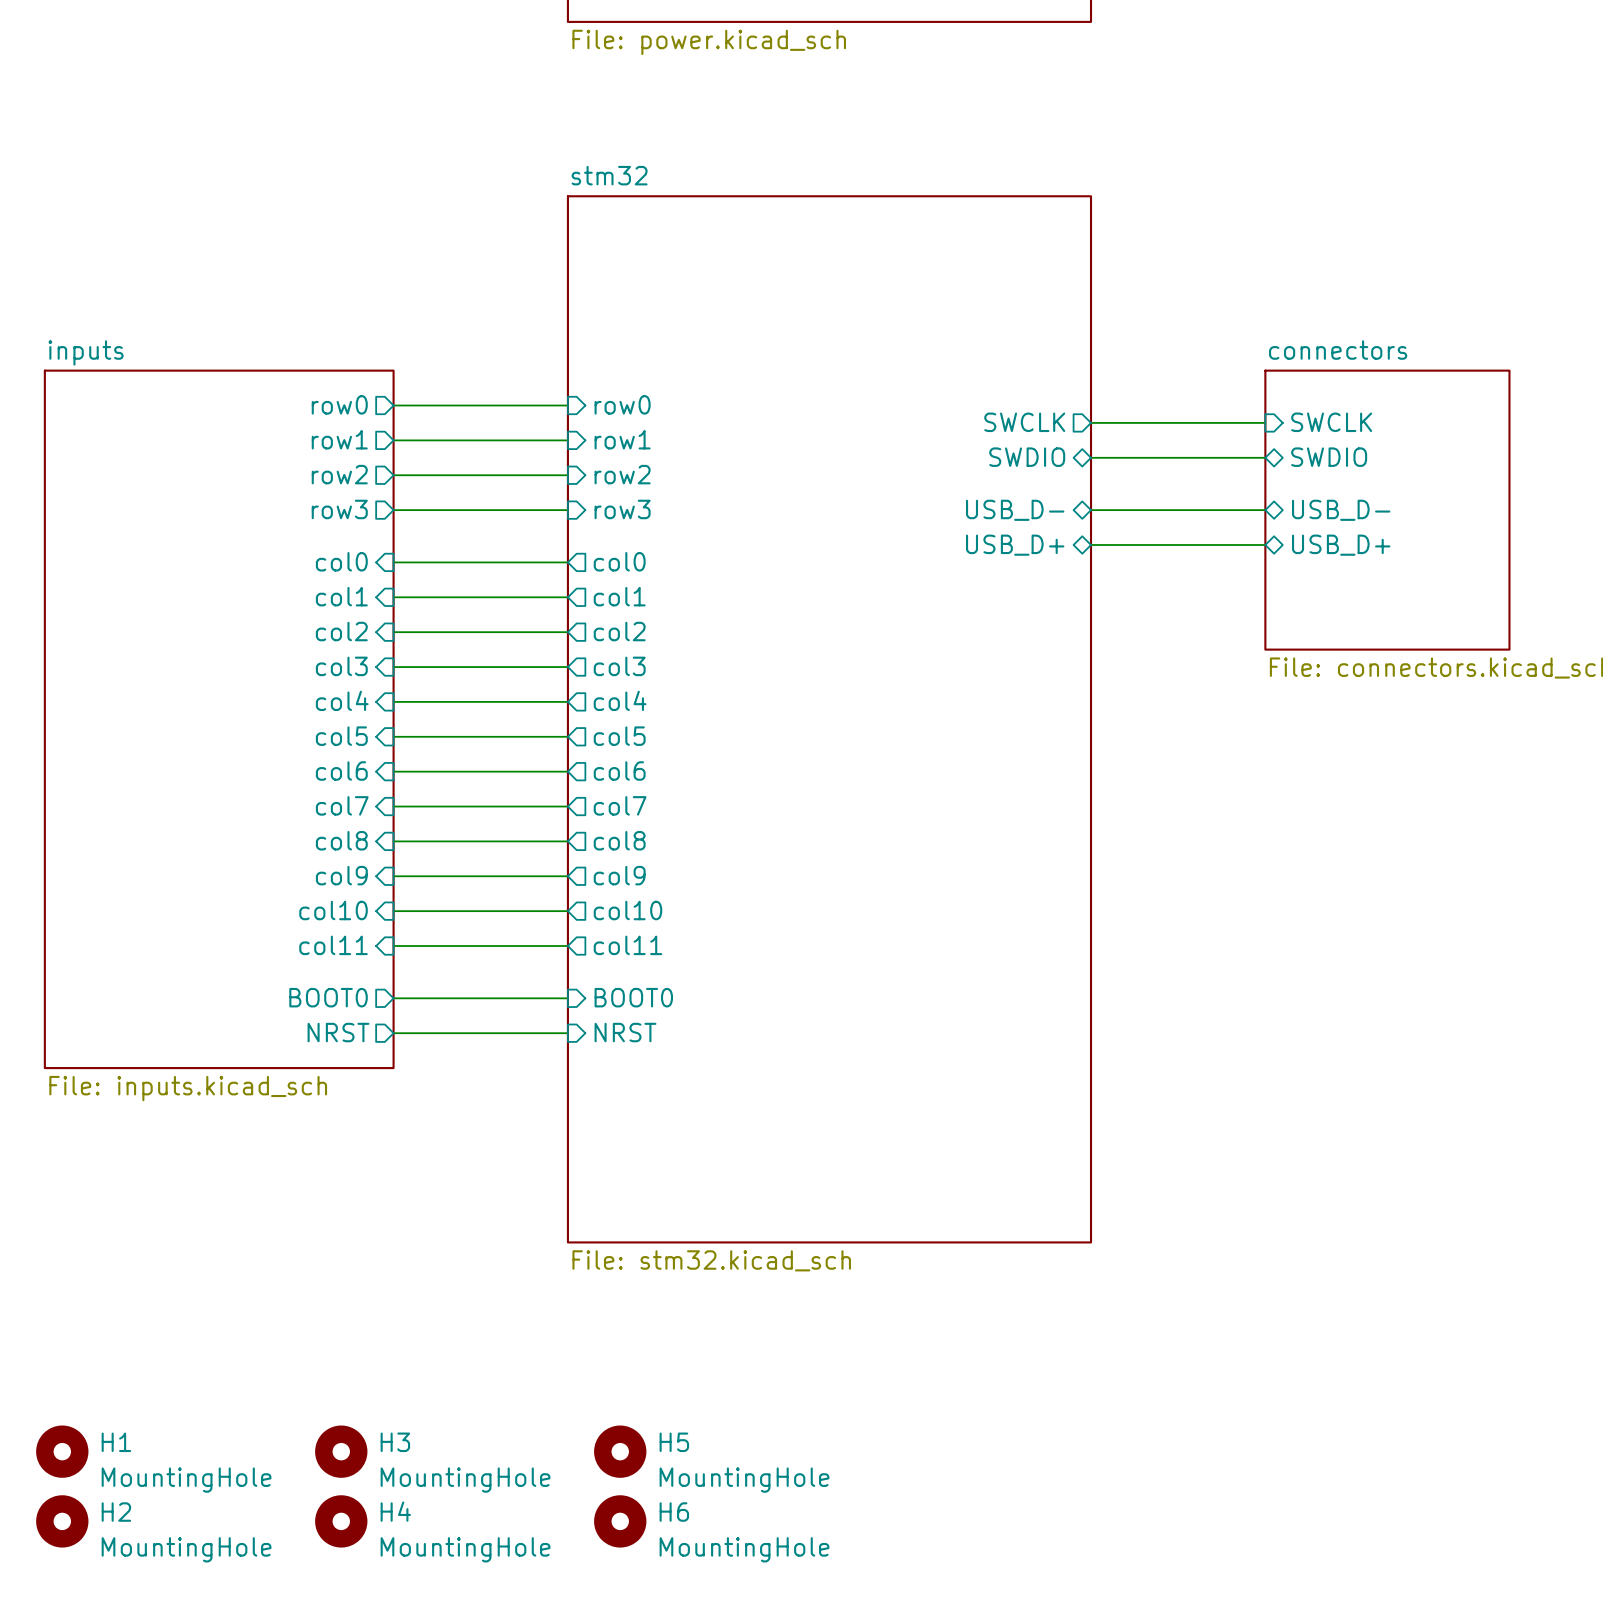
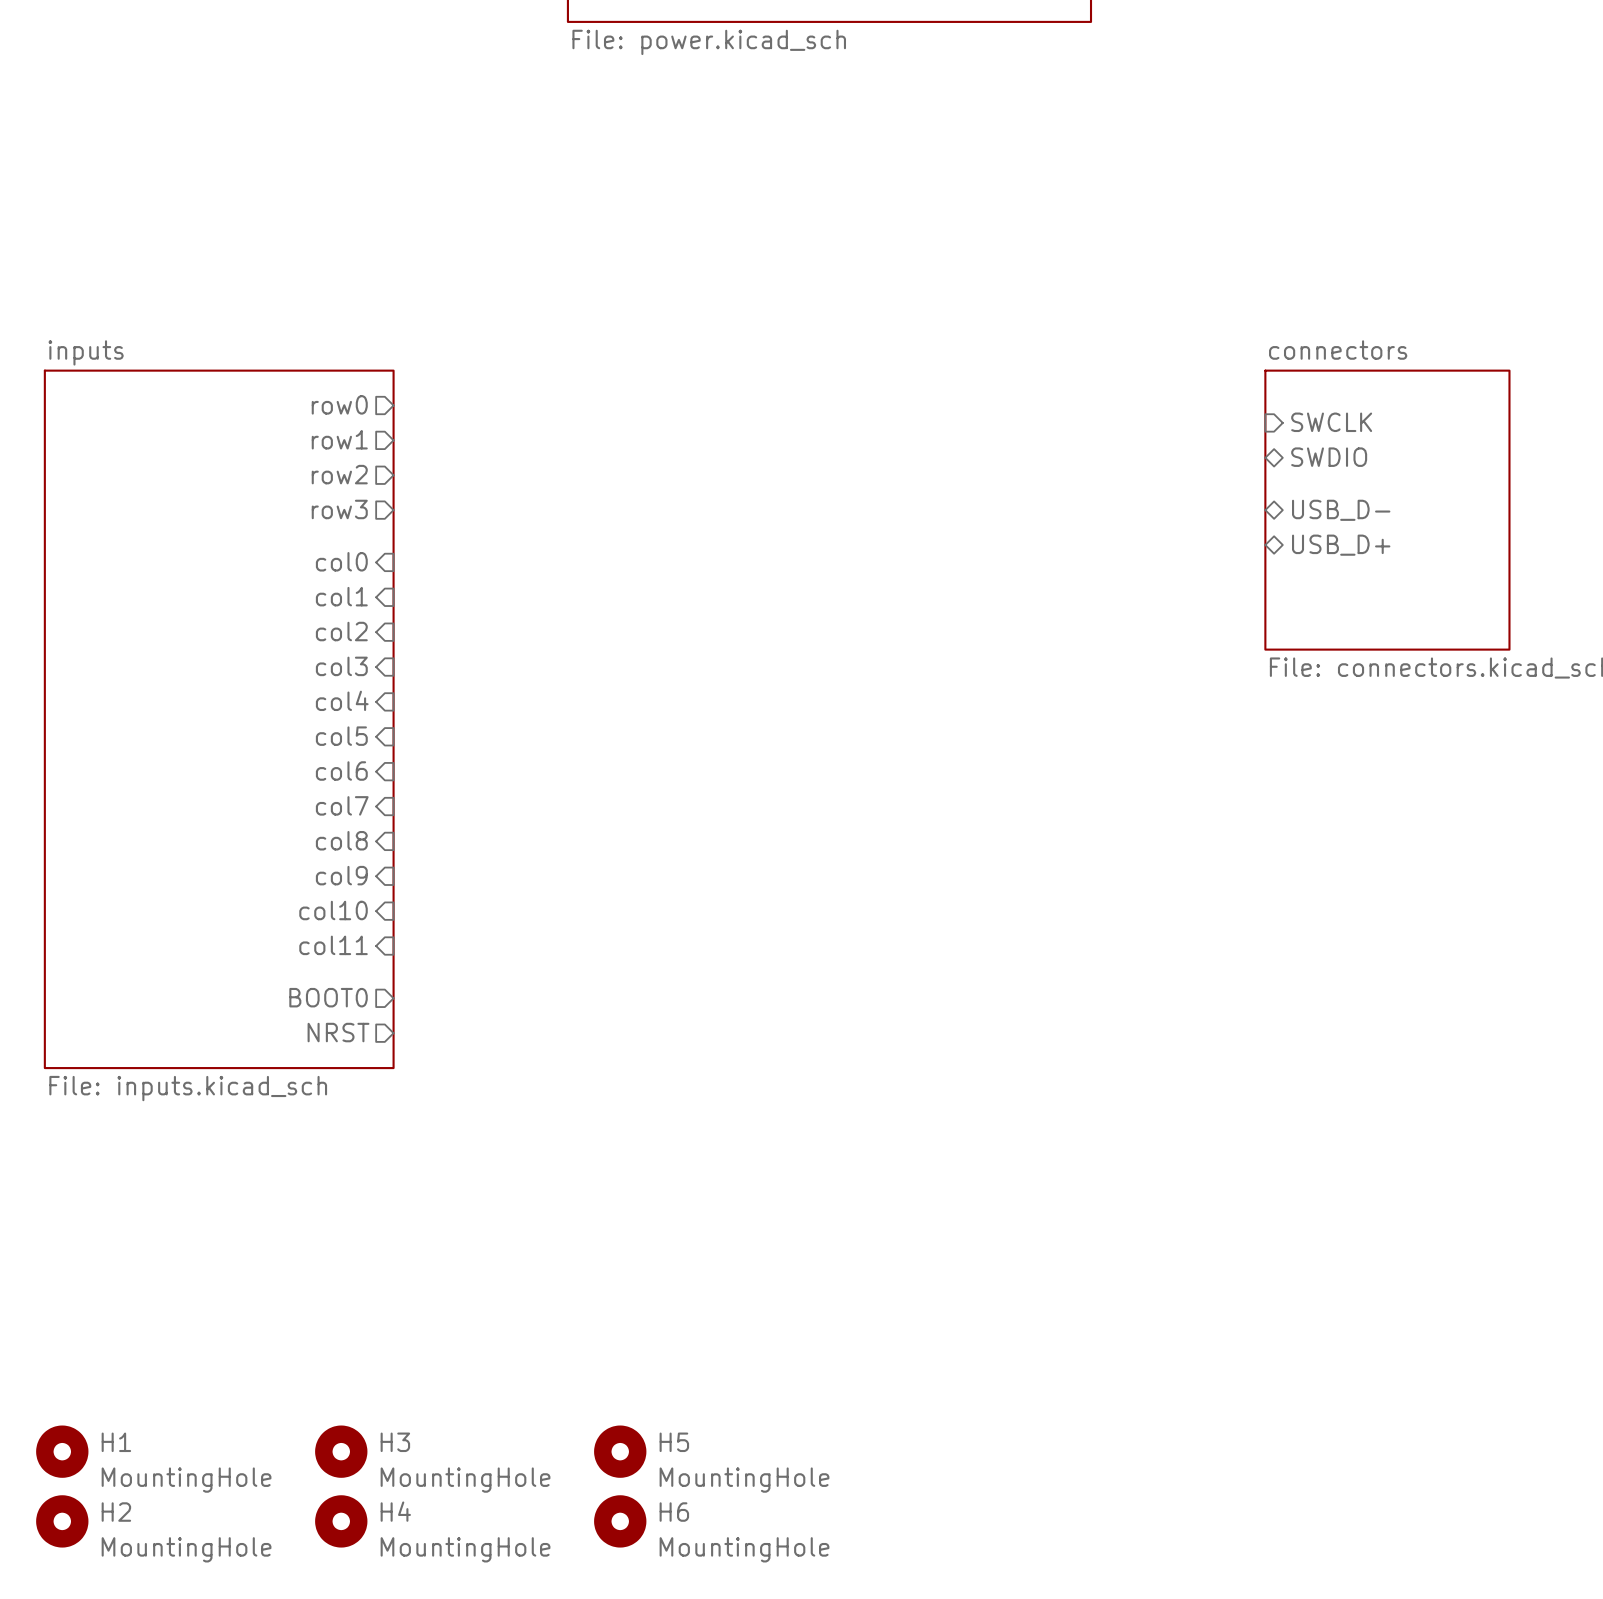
sheet pin: row0 (622, 404) -> none
wire: (393, 405) (567, 405) -> none
sheet pin: SWCLK (1024, 422) -> none
wire: (1091, 422) (1265, 422) -> none
sheet pin: row1 (622, 439) -> none
wire: (393, 440) (567, 440) -> none
sheet pin: SWDIO (1027, 457) -> none
wire: (1091, 457) (1265, 457) -> none
sheet pin: row2 (622, 474) -> none
wire: (393, 475) (567, 475) -> none
sheet pin: row3 (622, 509) -> none
wire: (393, 510) (567, 510) -> none
sheet pin: USB_D- (1015, 510) -> none
wire: (1091, 510) (1265, 510) -> none
wire: (1091, 544) (1265, 544) -> none
sheet pin: USB_D+ (1015, 545) -> none
sheet pin: col0 (619, 561) -> none
wire: (393, 562) (567, 562) -> none
sheet pin: col1 (619, 596) -> none
wire: (393, 597) (567, 597) -> none
sheet pin: col2 (619, 631) -> none
wire: (393, 632) (567, 632) -> none
sheet pin: col3 (619, 666) -> none
wire: (393, 667) (567, 667) -> none
sheet pin: col4 (620, 700) -> none
wire: (393, 701) (567, 701) -> none
sheet stm32: File: stm32.kicad_sch (829, 719) -> none
wire: (393, 736) (567, 736) -> none
sheet pin: col5 (619, 736) -> none
wire: (393, 771) (567, 771) -> none
sheet pin: col6 (619, 771) -> none
sheet pin: col7 (620, 805) -> none
wire: (393, 806) (567, 806) -> none
sheet pin: col8 (619, 840) -> none
wire: (393, 841) (567, 841) -> none
sheet pin: col9 (619, 875) -> none
wire: (393, 876) (567, 876) -> none
sheet pin: col10 (627, 910) -> none
wire: (393, 911) (567, 911) -> none
sheet pin: col11 (627, 945) -> none
wire: (393, 946) (567, 946) -> none
sheet pin: BOOT0 (633, 997) -> none
wire: (393, 998) (567, 998) -> none
sheet pin: NRST (625, 1032) -> none
wire: (393, 1033) (567, 1033) -> none

